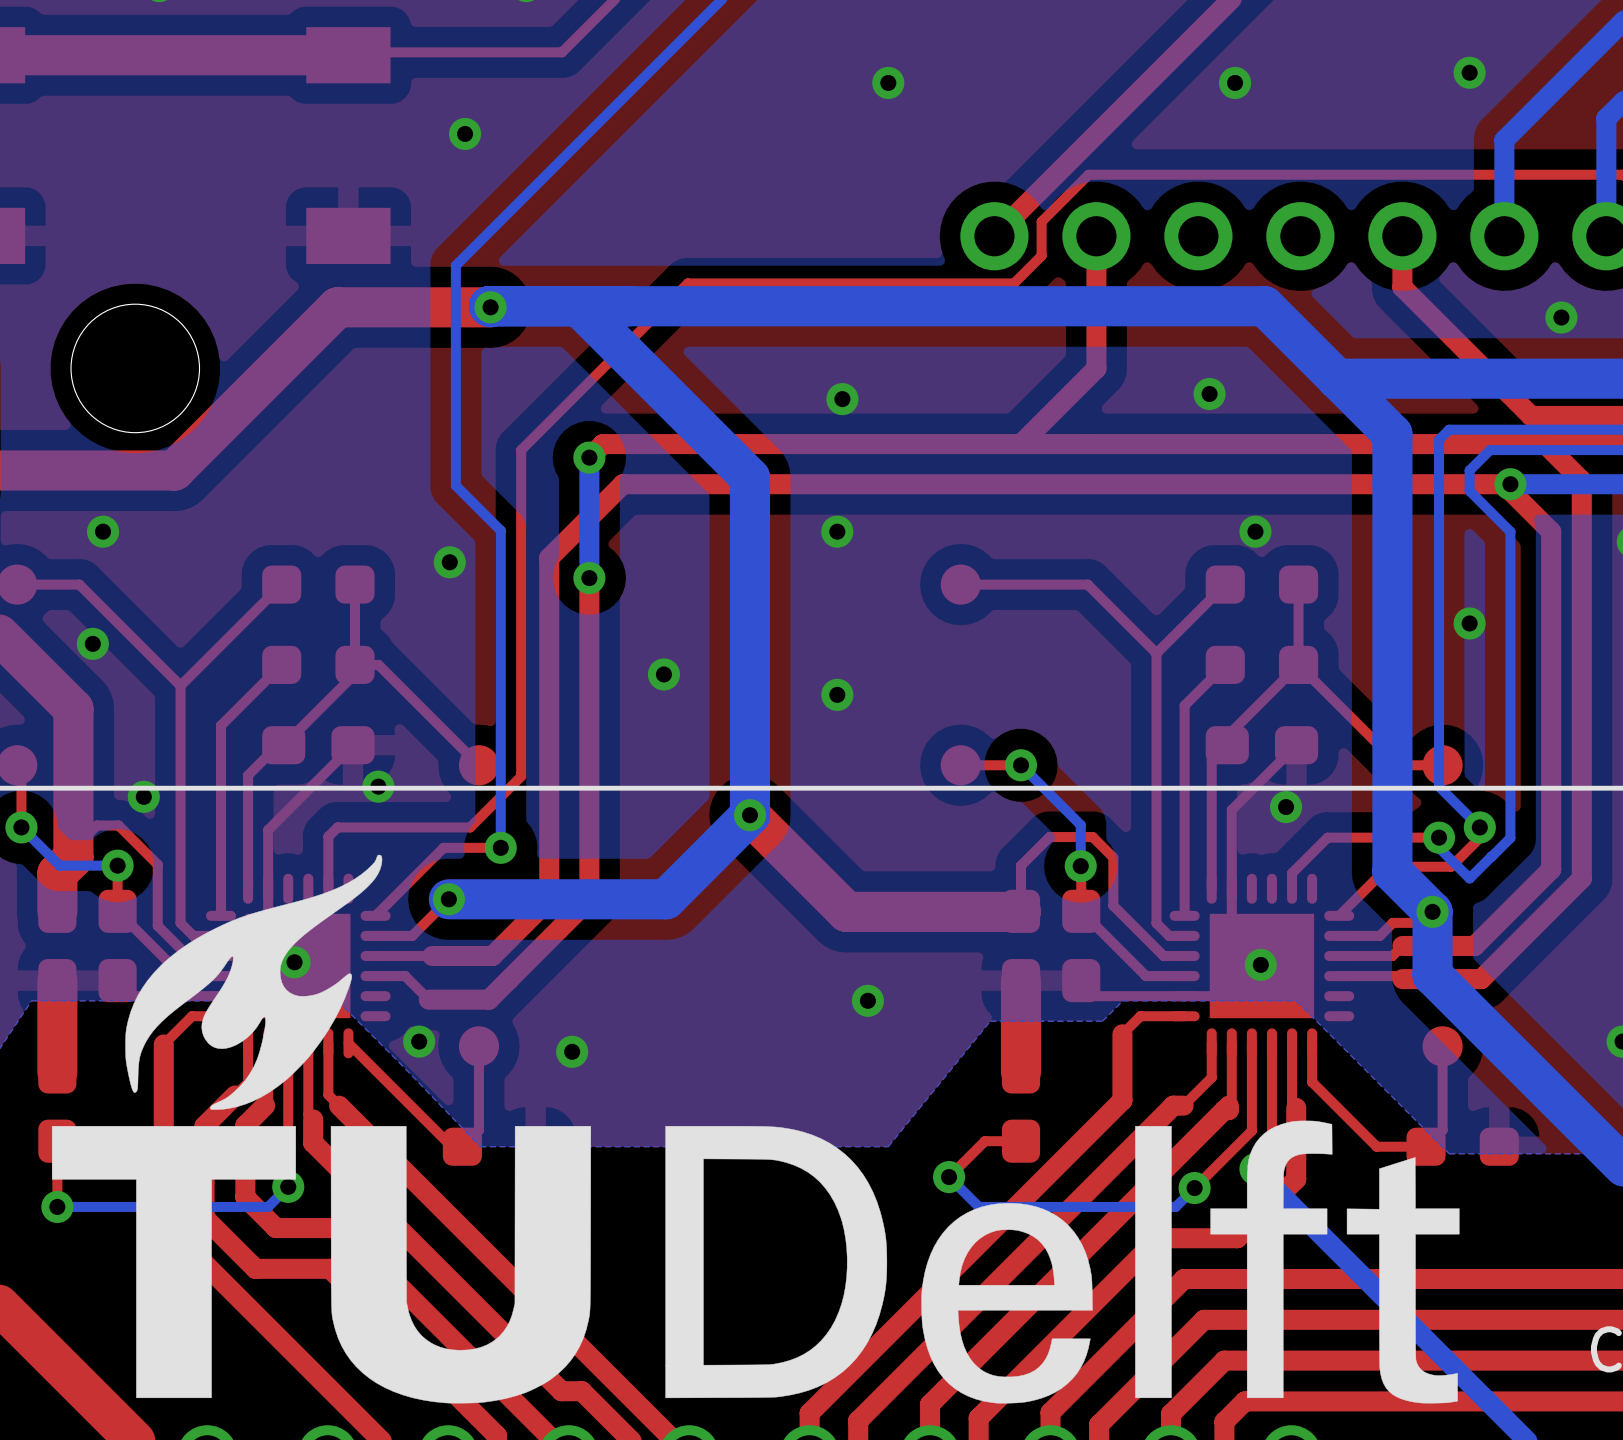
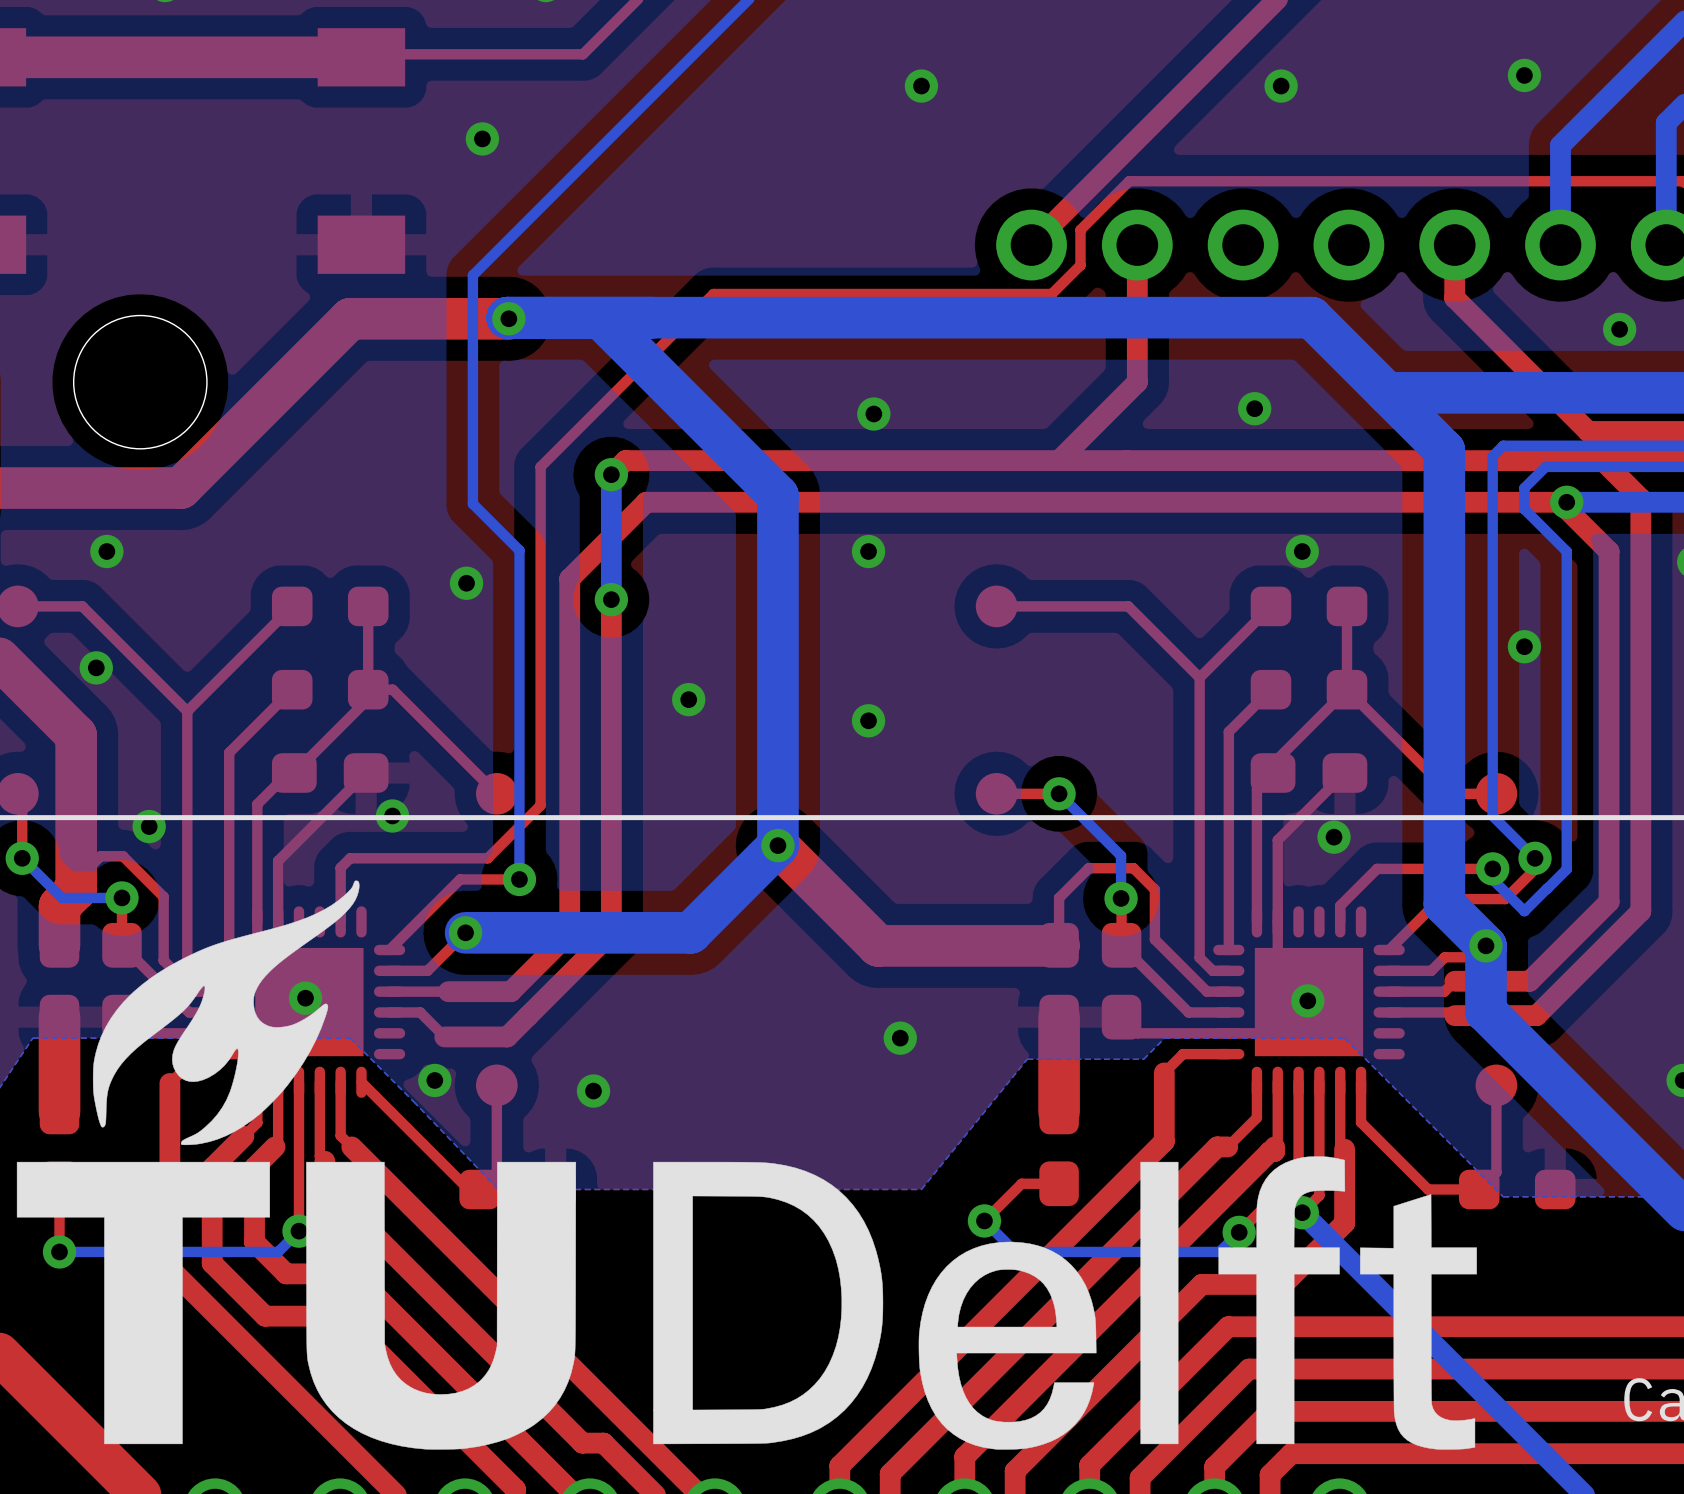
drawing position: (755, 1129) -> (746, 1165)

